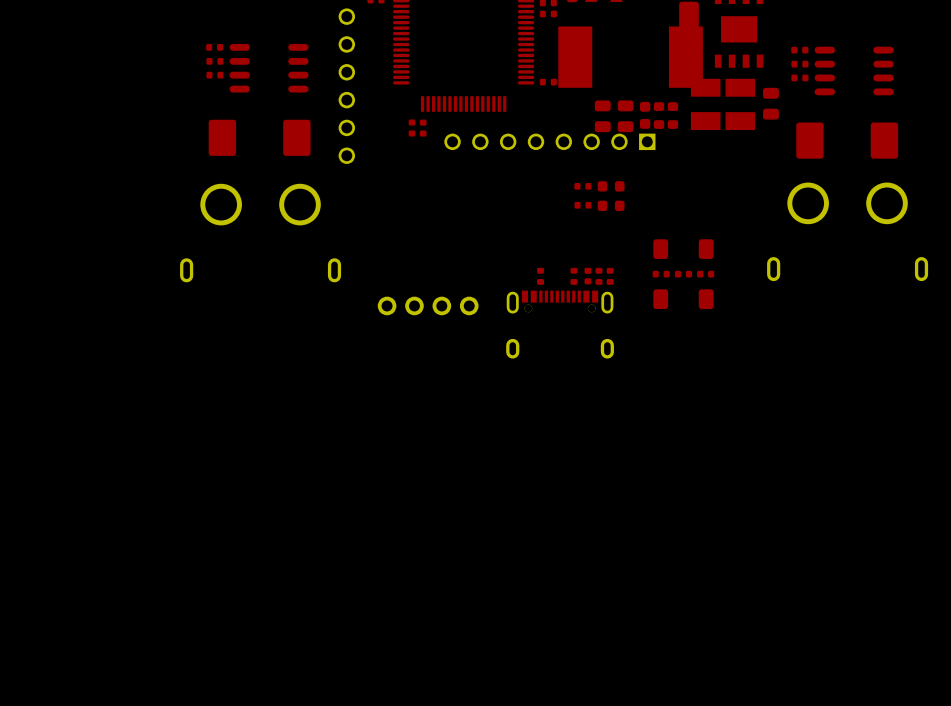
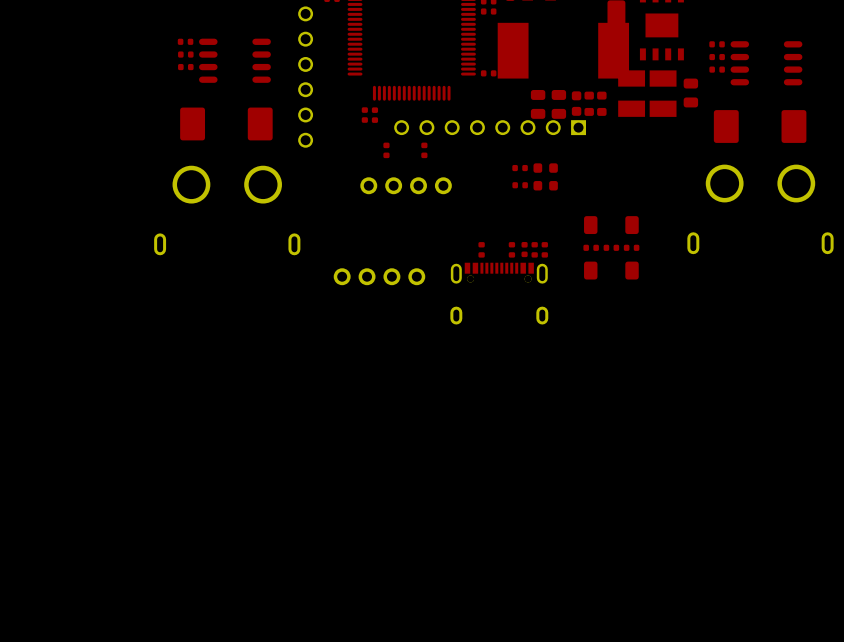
part: none -> (386, 150)
part: none -> (424, 150)
part: none -> (406, 185)

